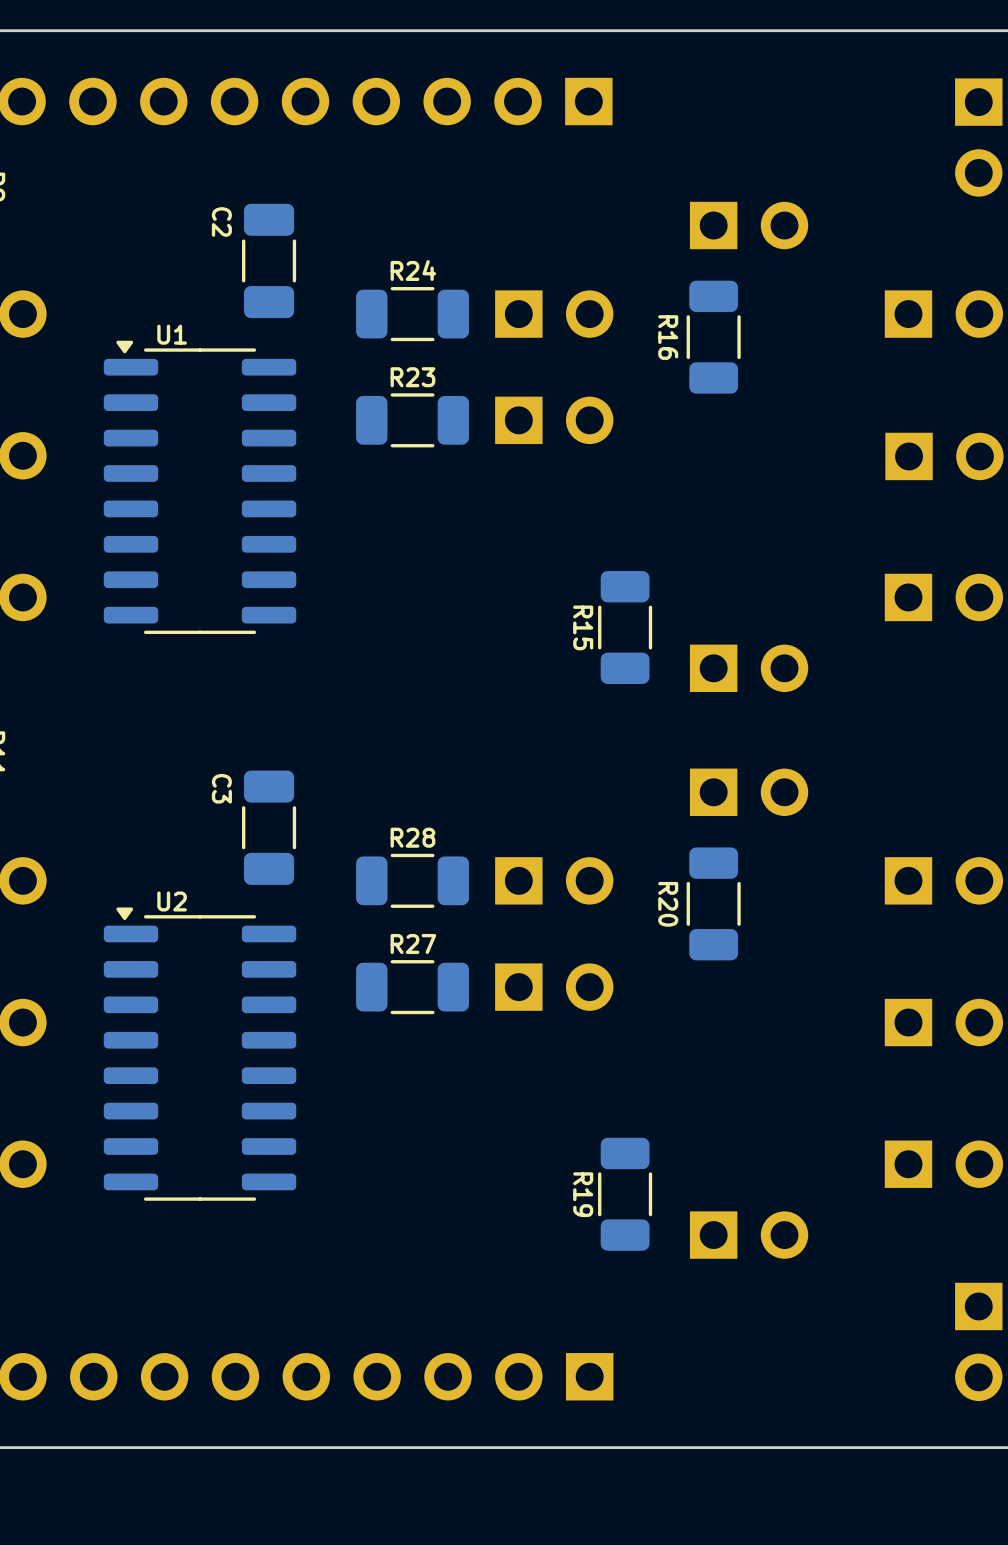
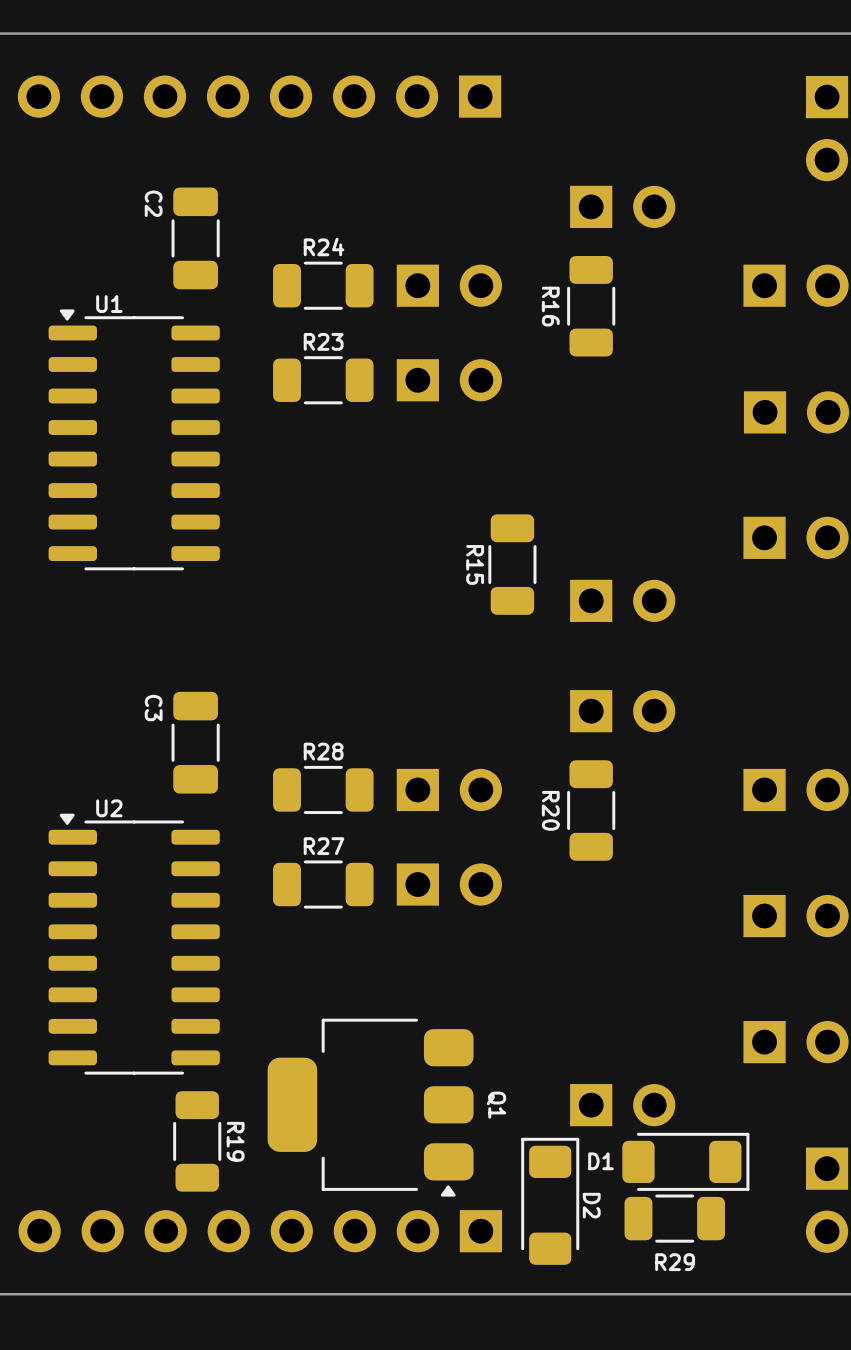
R19 name position: R19 (583, 1194) -> R19 (235, 1141)
R19 position: (625, 1194) -> (197, 1141)
Q1: none -> (370, 1107)
D1: none -> (685, 1161)
D2: none -> (550, 1201)
R29: none -> (674, 1218)

